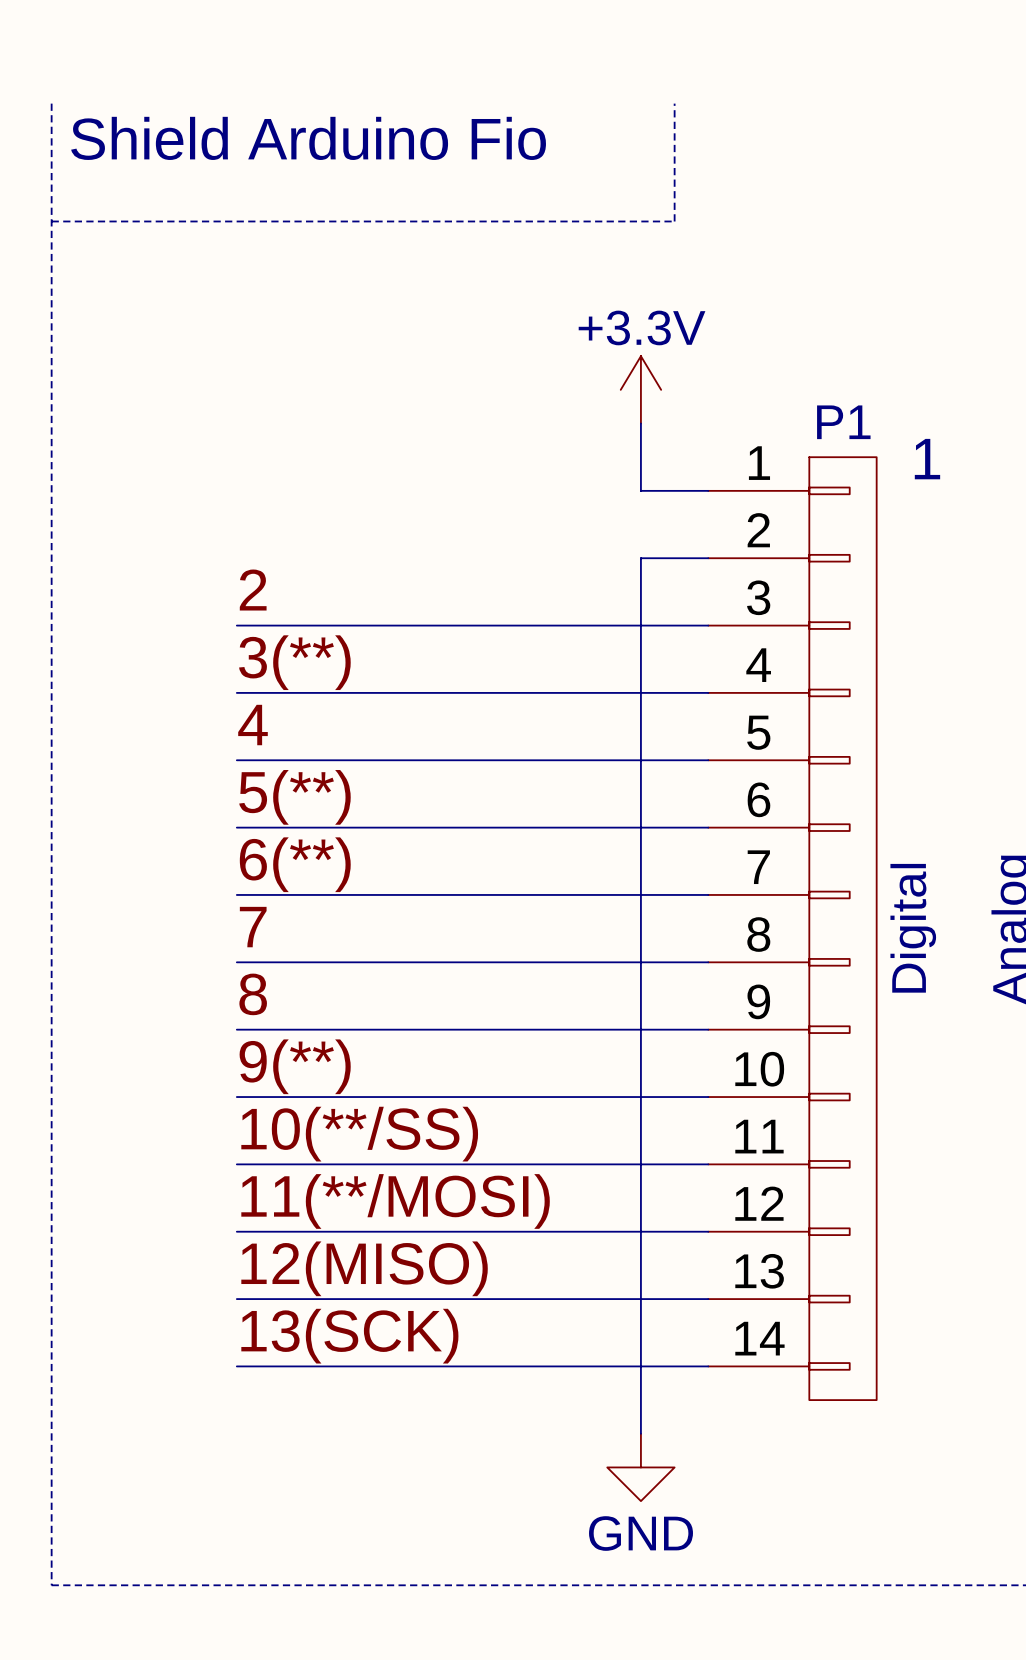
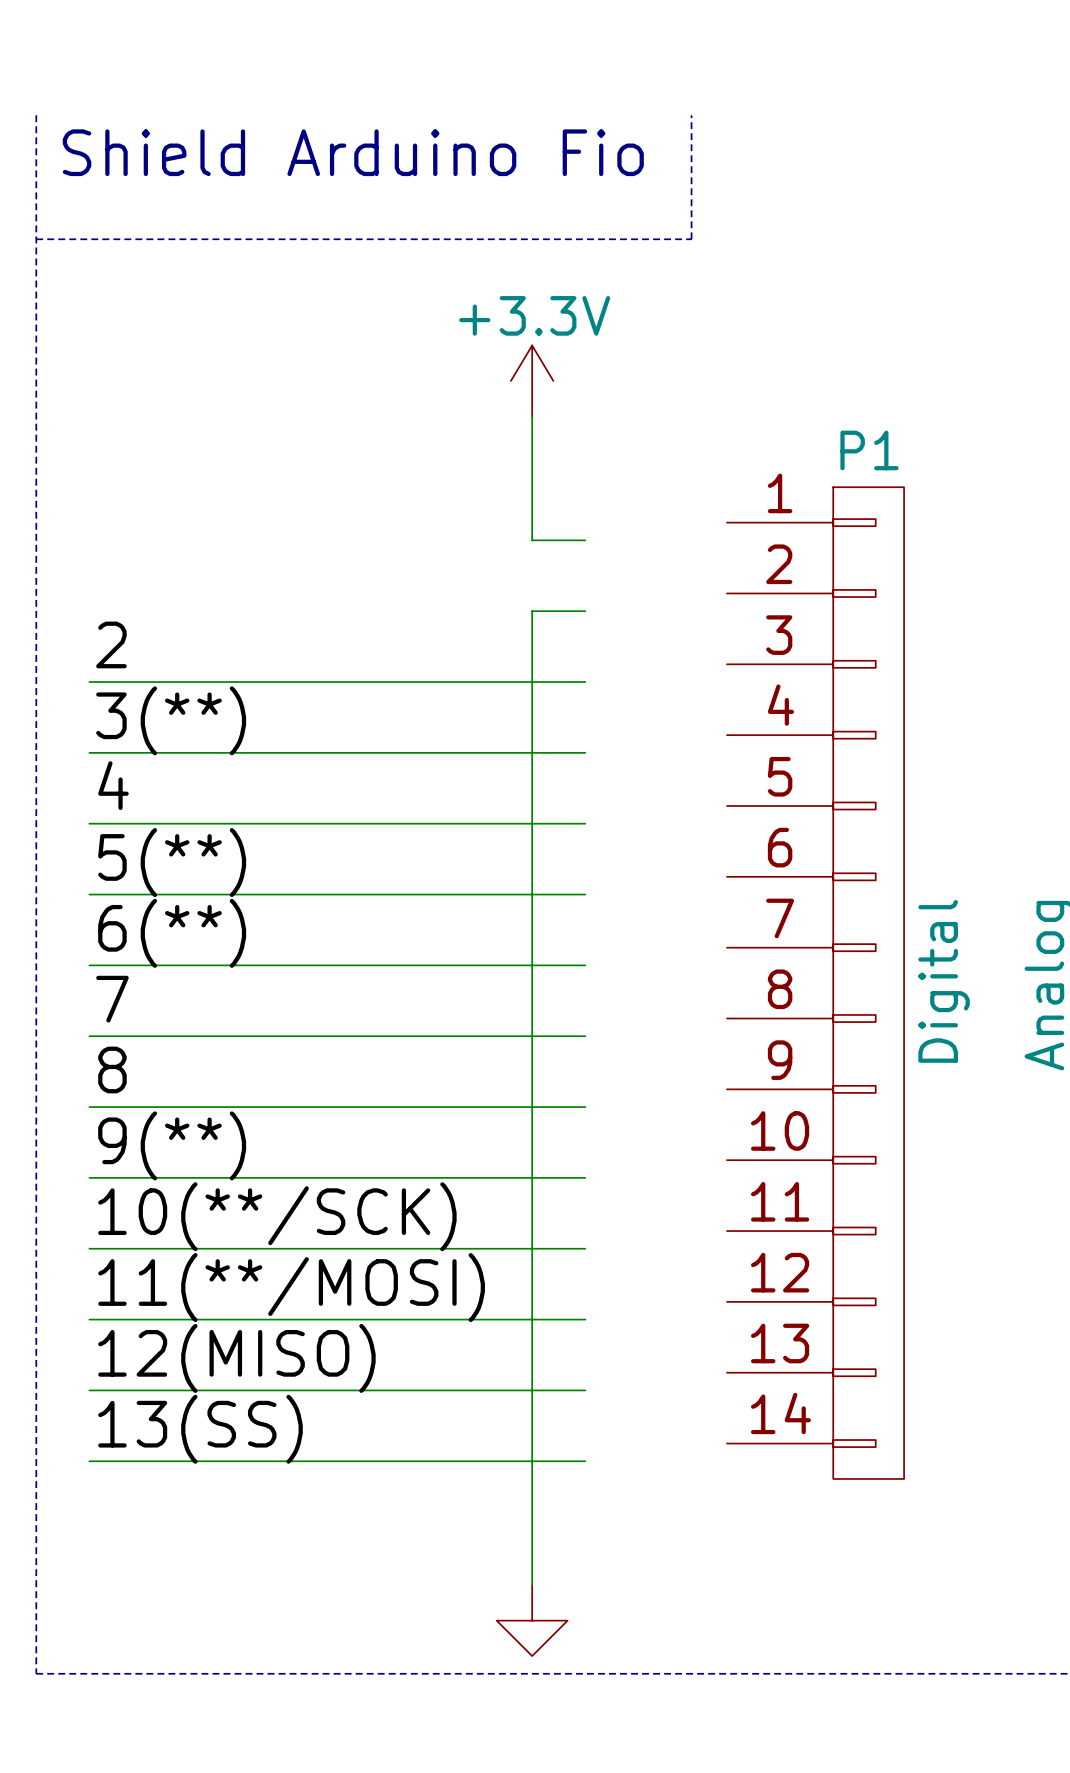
wire: none -> (532, 416) (532, 540) (585, 540)
power symbol position: +3.3V (640, 389) -> +3.3V (532, 380)
wire: (640, 423) (640, 490) (708, 490) -> none
text: 1 (927, 459) -> none
wire: (708, 558) (640, 558) (640, 1433) -> none
wire: none -> (585, 611) (532, 611) (532, 1585)
label position: 2 (253, 590) -> 2 (111, 644)
wire: (236, 625) (708, 625) -> (89, 682) (585, 682)
label position: 3(**) (294, 662) -> 3(**) (171, 720)
wire: (236, 692) (708, 692) -> (89, 752) (585, 752)
label position: 4 (253, 725) -> 4 (113, 785)
wire: (236, 760) (708, 760) -> (89, 823) (585, 823)
label position: 5(**) (294, 797) -> 5(**) (172, 862)
wire: (236, 827) (708, 827) -> (89, 894) (585, 894)
label position: 6(**) (295, 864) -> 6(**) (172, 933)
wire: (236, 894) (708, 894) -> (89, 965) (585, 965)
label position: 7 (253, 927) -> 7 (112, 999)
wire: (236, 962) (708, 962) -> (89, 1036) (585, 1036)
label position: 8 (253, 994) -> 8 (112, 1069)
wire: (236, 1029) (708, 1029) -> (89, 1107) (585, 1107)
label position: 9(**) (295, 1066) -> 9(**) (172, 1145)
wire: (236, 1097) (708, 1097) -> (89, 1177) (585, 1177)
label: 10(**/SS) (359, 1134) -> 10(**/SCK) (277, 1216)
wire: (236, 1164) (708, 1164) -> (89, 1248) (585, 1248)
label position: 11(**/MOSI) (395, 1201) -> 11(**/MOSI) (291, 1287)
wire: (236, 1231) (708, 1231) -> (89, 1319) (585, 1319)
label position: 12(MISO) (364, 1268) -> 12(MISO) (236, 1358)
wire: (236, 1299) (708, 1299) -> (89, 1390) (585, 1390)
label: 13(SCK) (349, 1336) -> 13(SS) (200, 1429)
wire: (236, 1366) (708, 1366) -> (89, 1461) (585, 1461)
power symbol: GND (640, 1467) -> none
power symbol: none -> (532, 1620)

